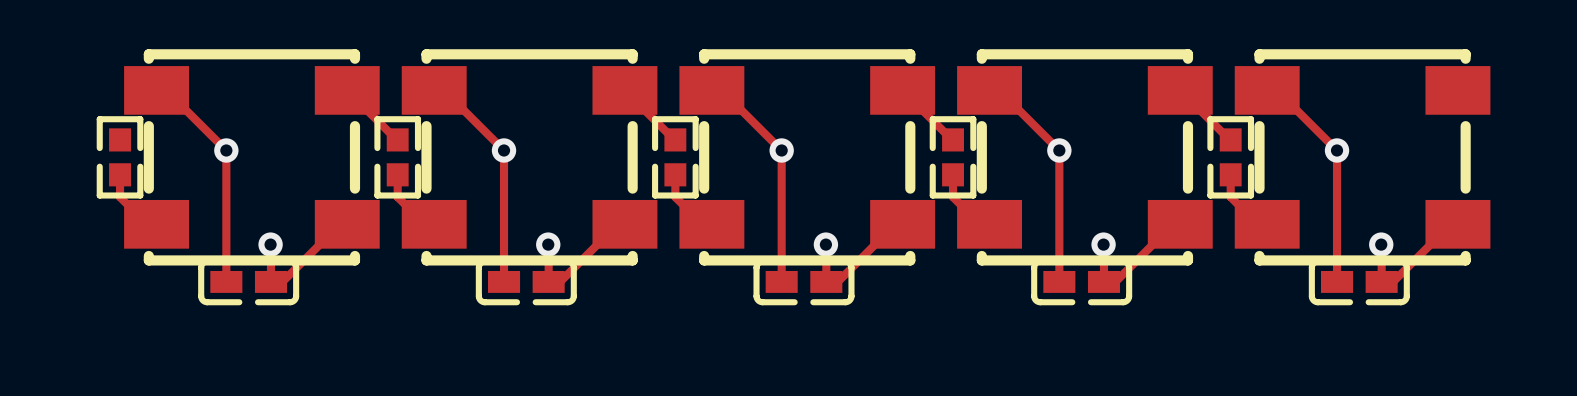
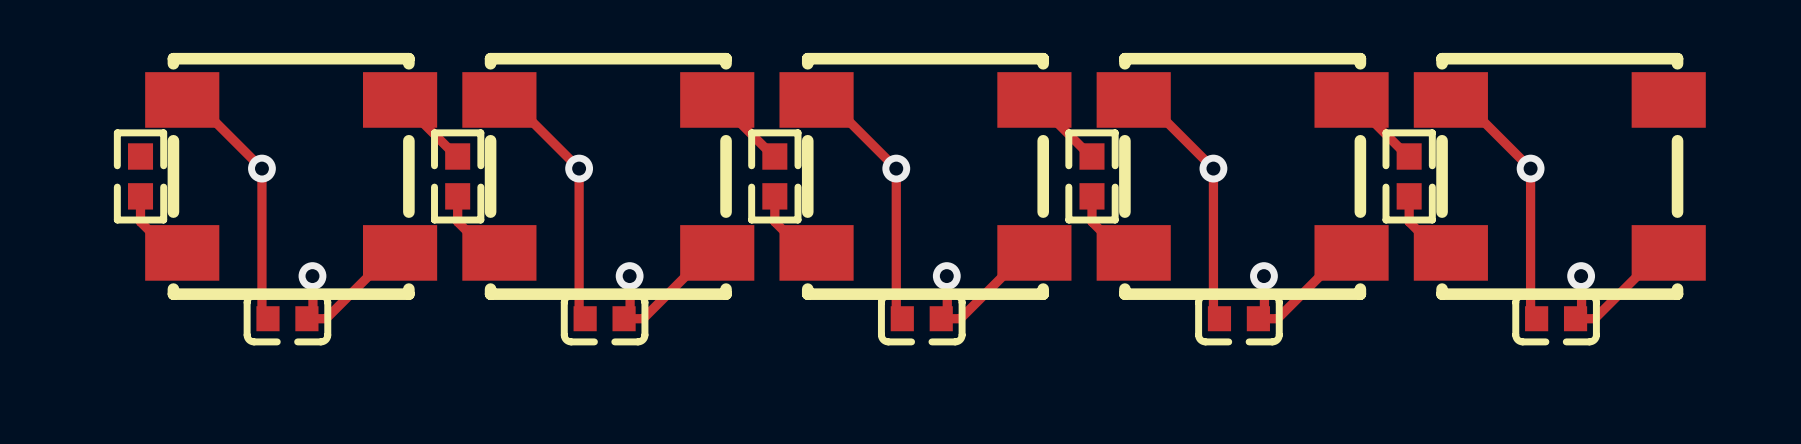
part footprint: [198, 258, 300, 306] -> [243, 292, 332, 346]
part footprint: [475, 258, 577, 306] -> [560, 292, 649, 346]
part footprint: [753, 258, 855, 306] -> [877, 292, 966, 346]
part footprint: [1031, 258, 1133, 306] -> [1195, 292, 1283, 346]
part footprint: [1308, 258, 1410, 306] -> [1512, 292, 1600, 346]

